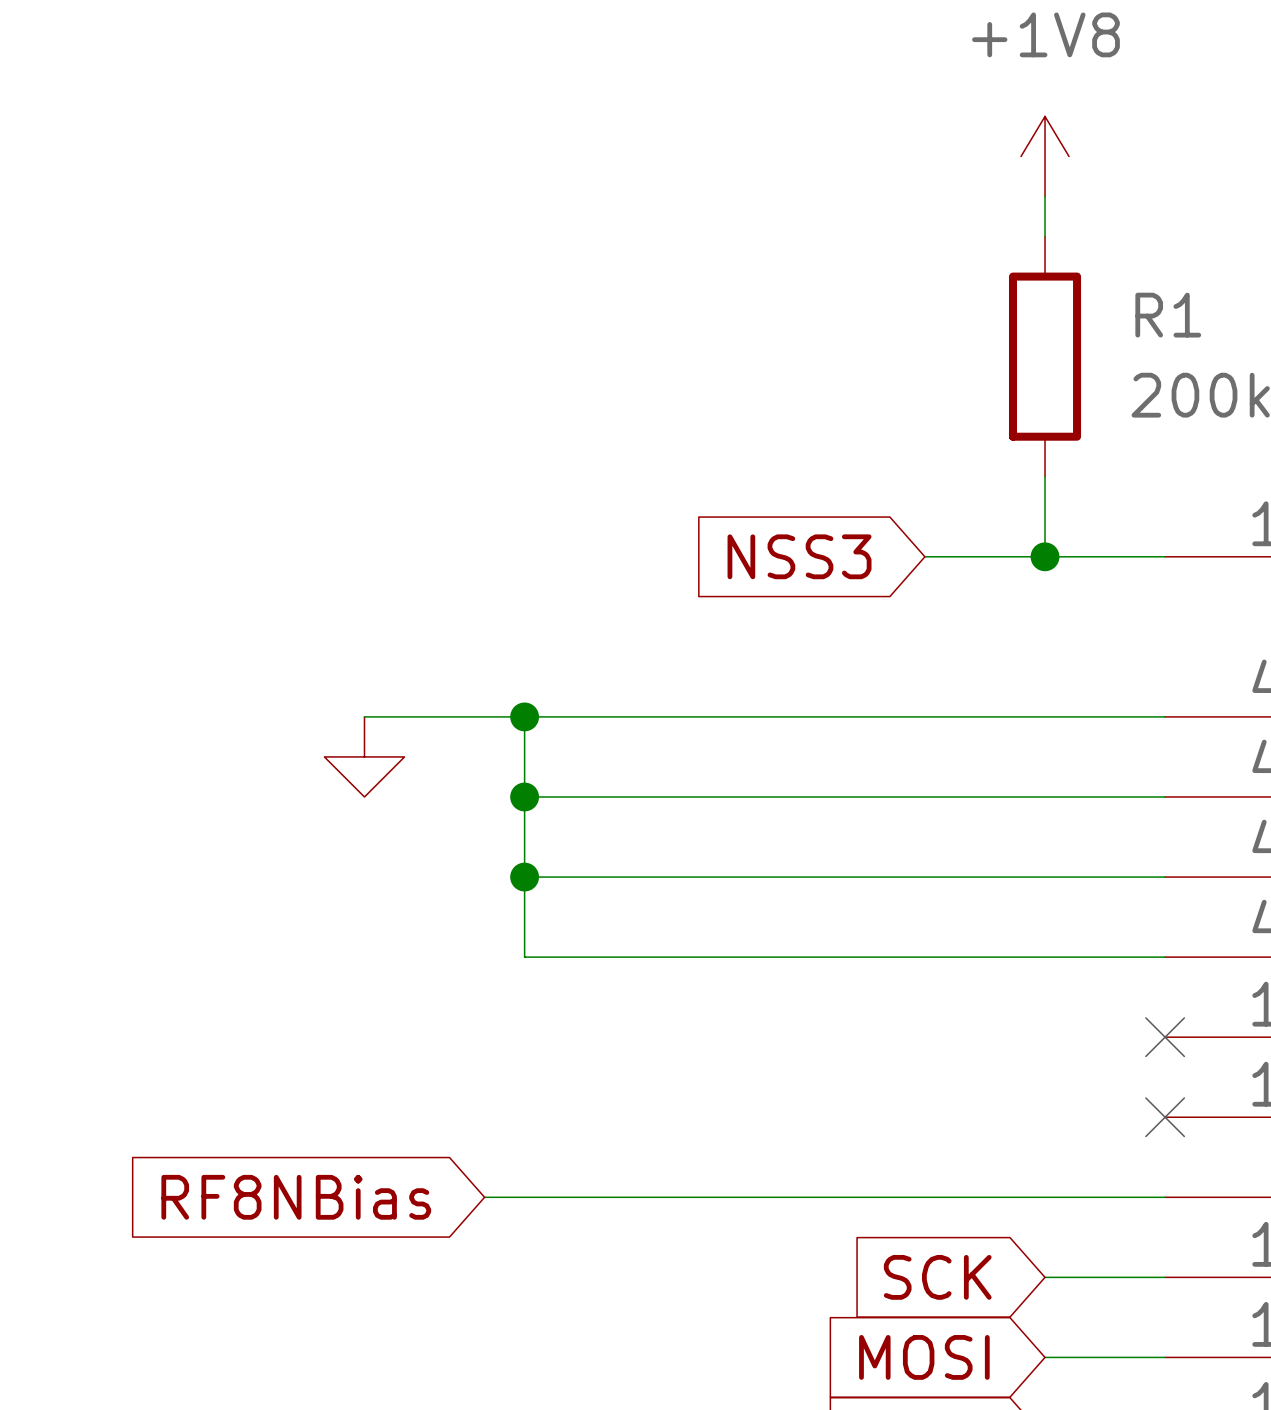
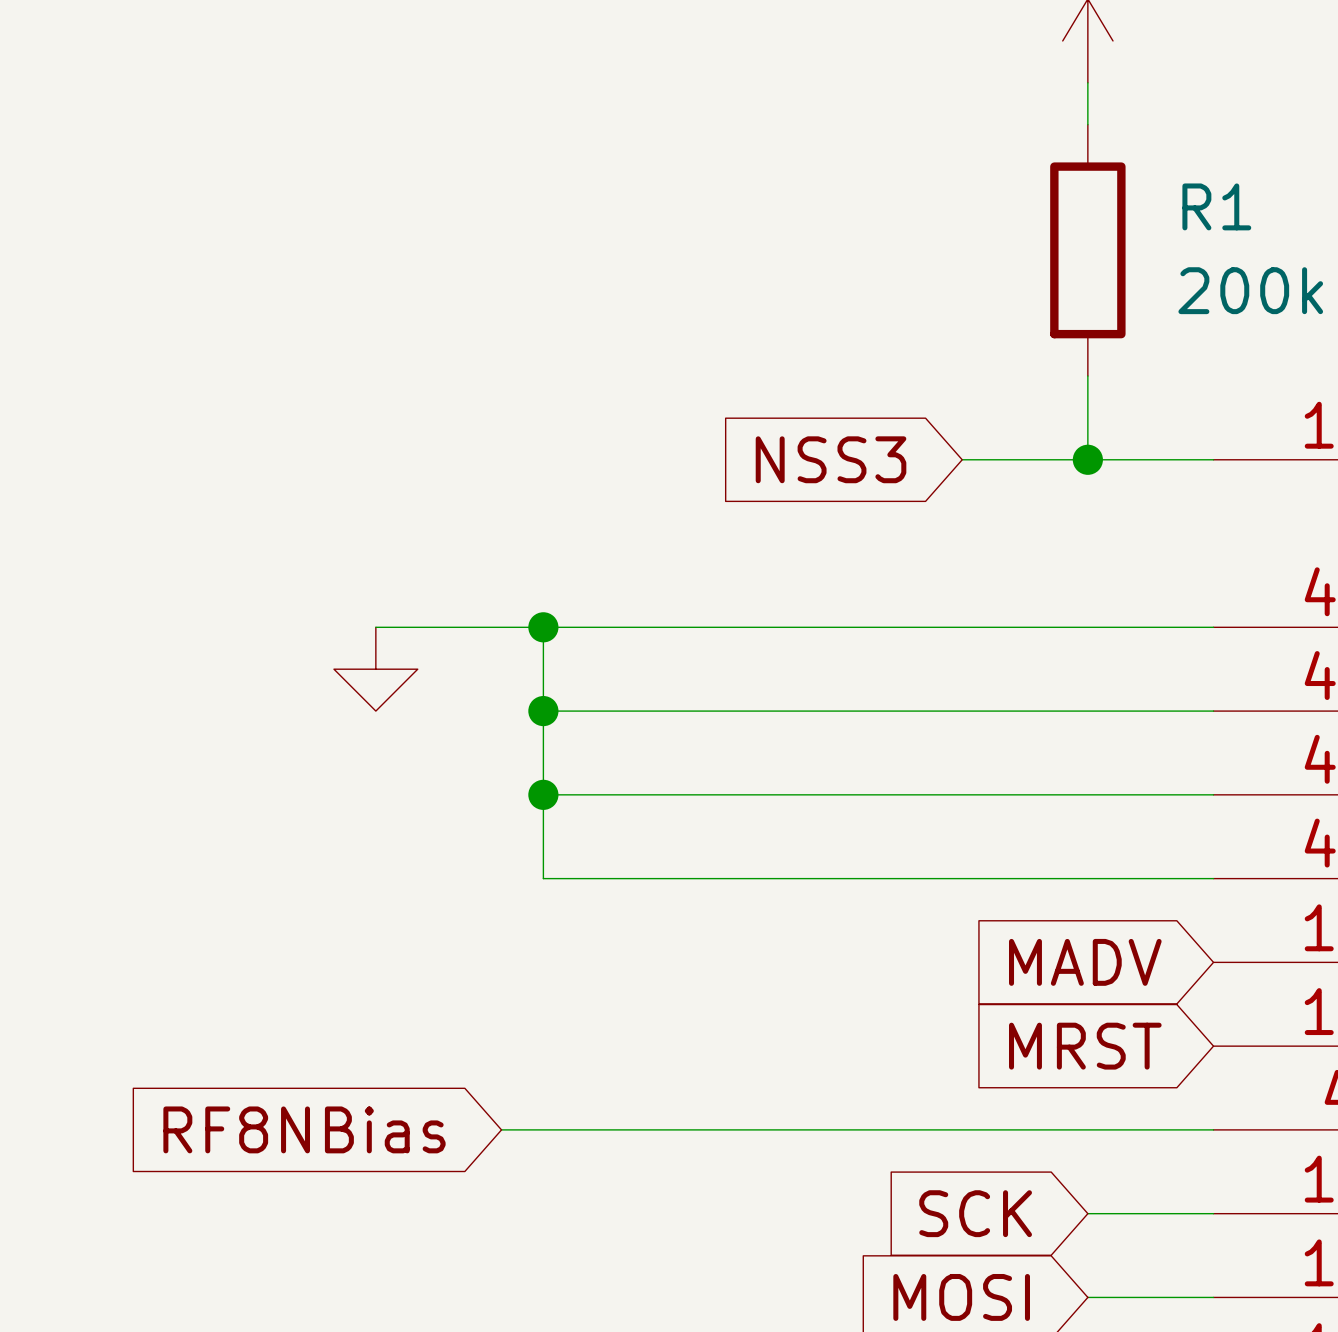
global label: none -> MADV (1085, 962)
no-connect mark: (1165, 1037) -> none
global label: none -> MRST (1085, 1046)
no-connect mark: (1165, 1117) -> none

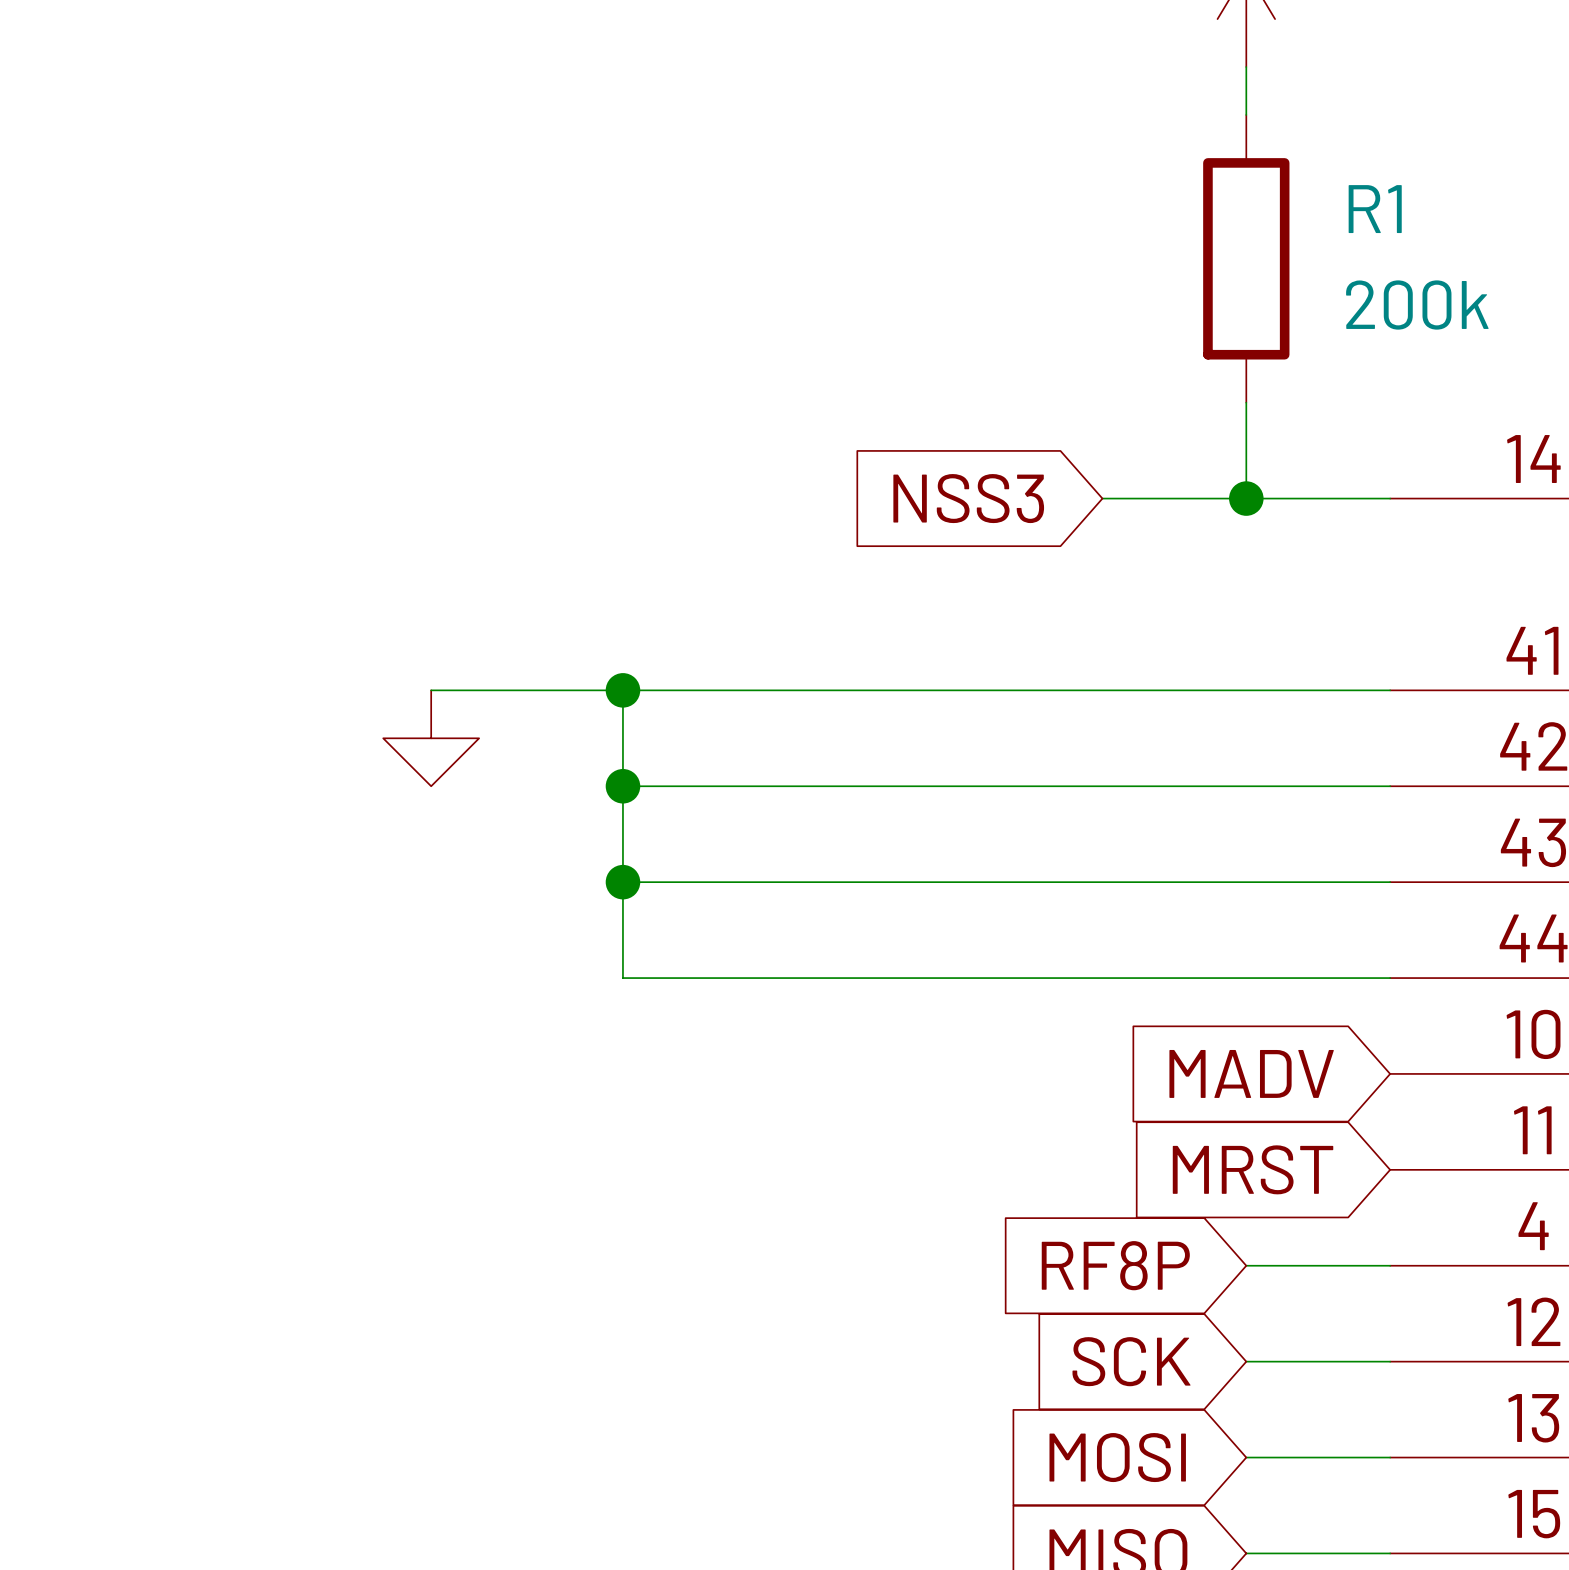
global label: RF8NBias (304, 1129) -> none
wire: (501, 1129) (1087, 1129) -> none
global label: none -> RF8P (1115, 1265)

